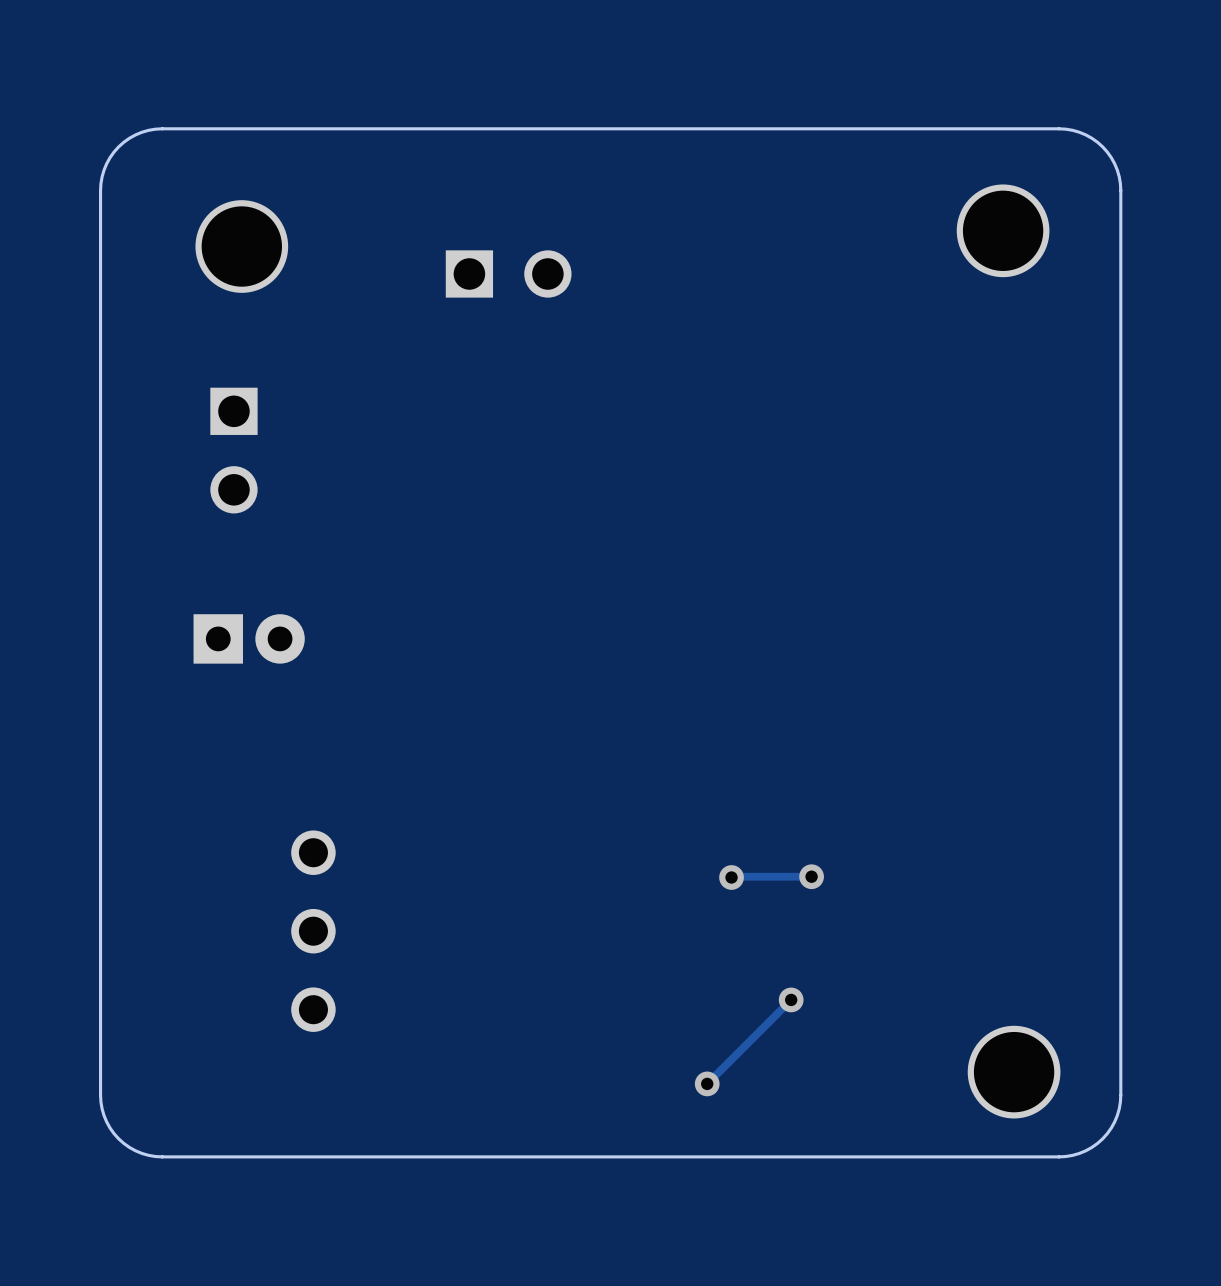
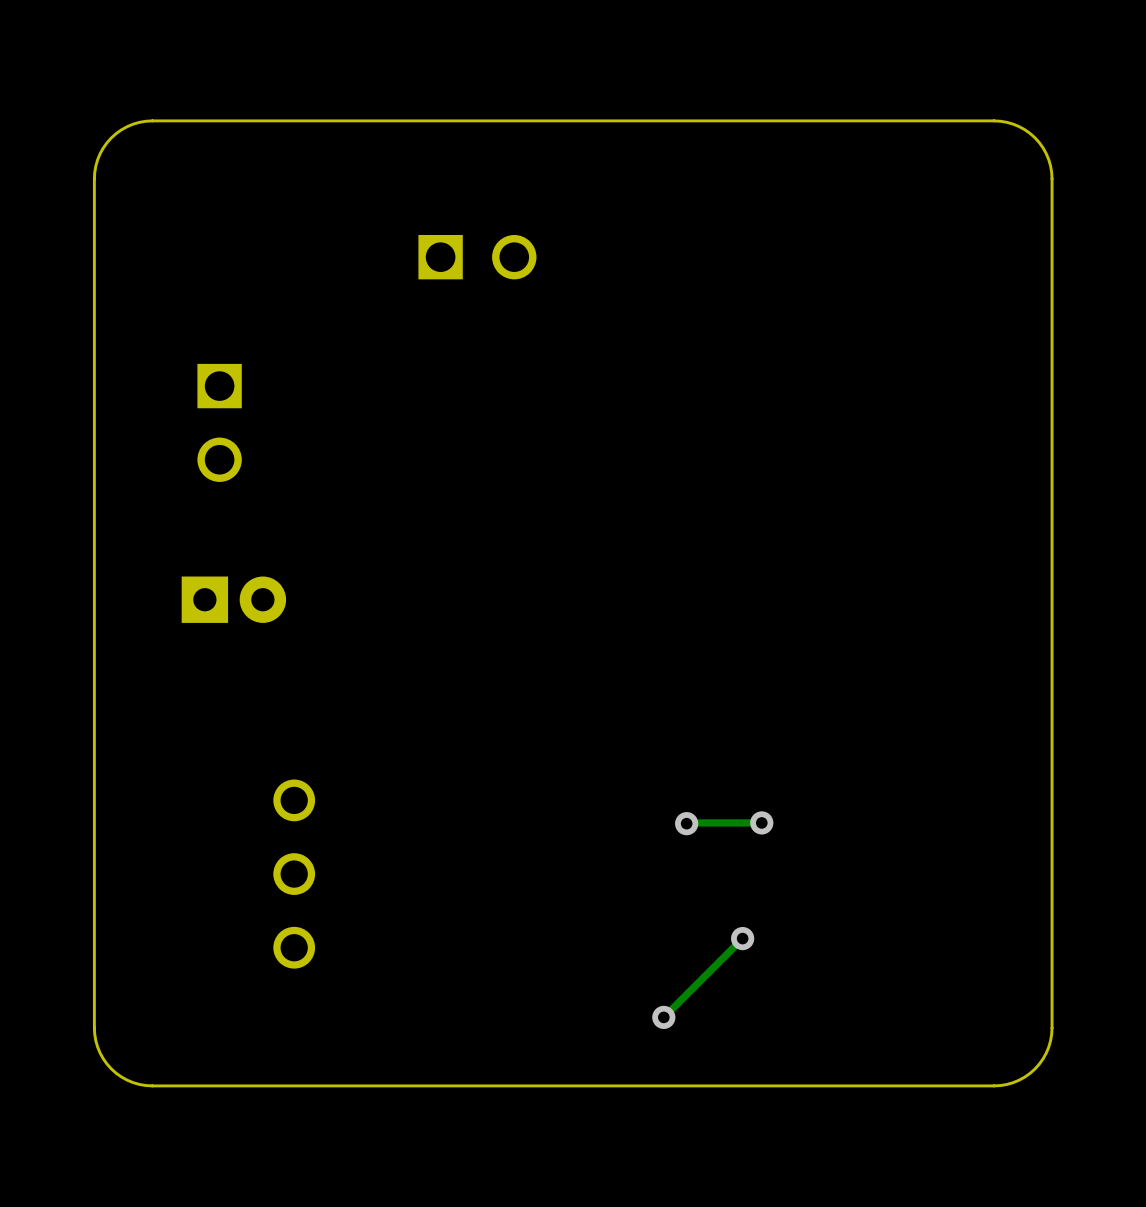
part: (1003, 230) -> none
part: (241, 246) -> none
part: (1014, 1072) -> none

